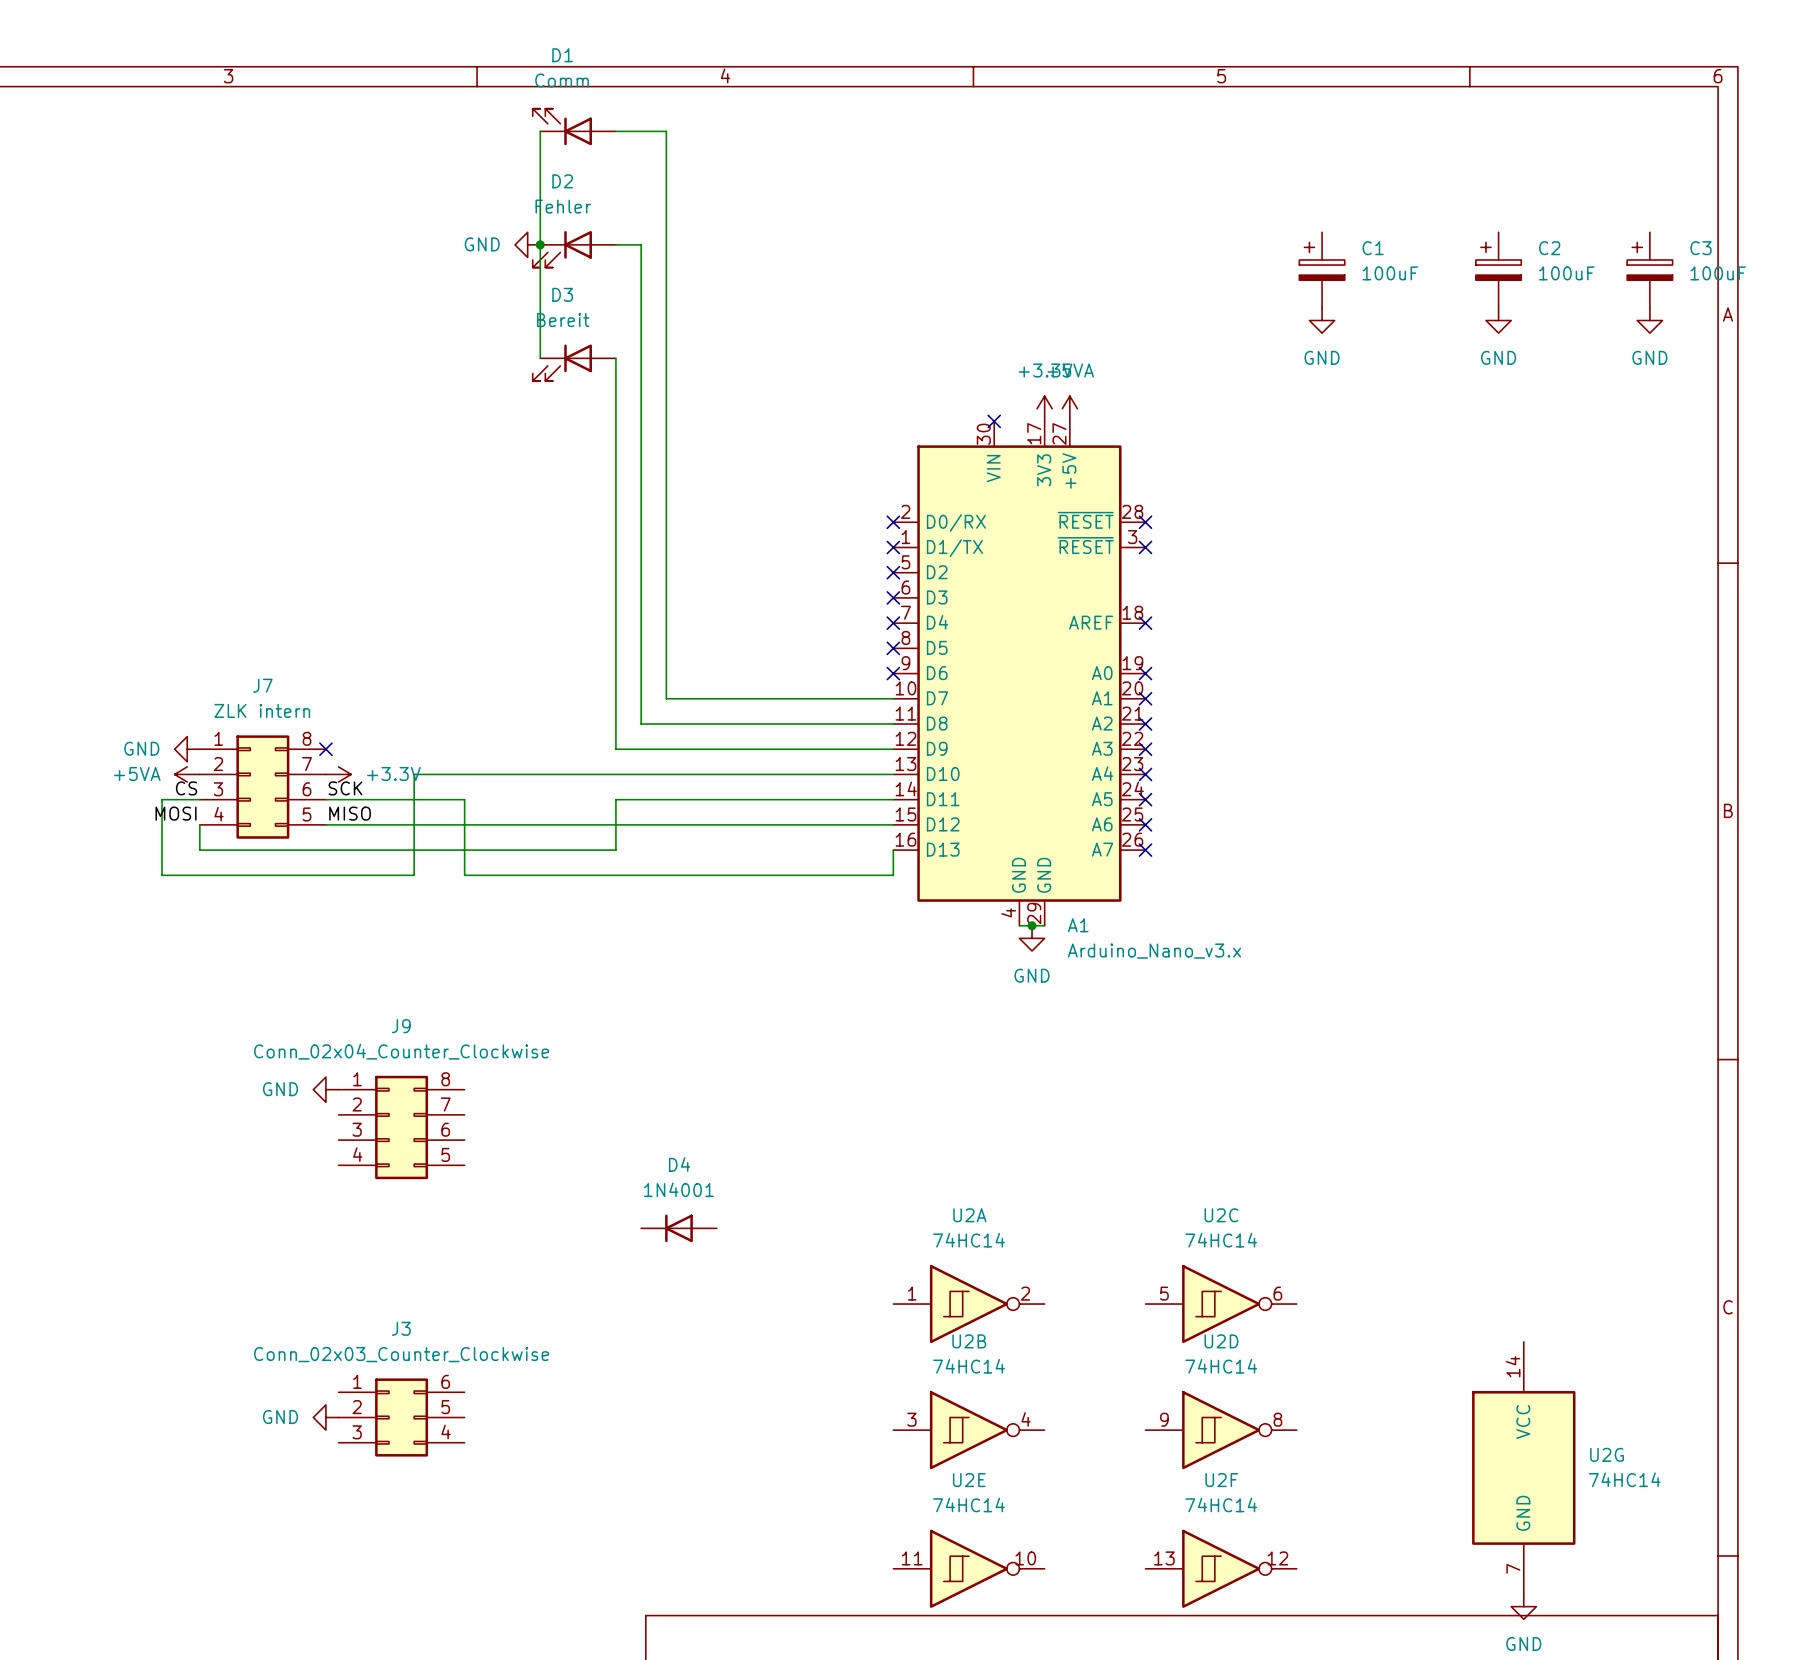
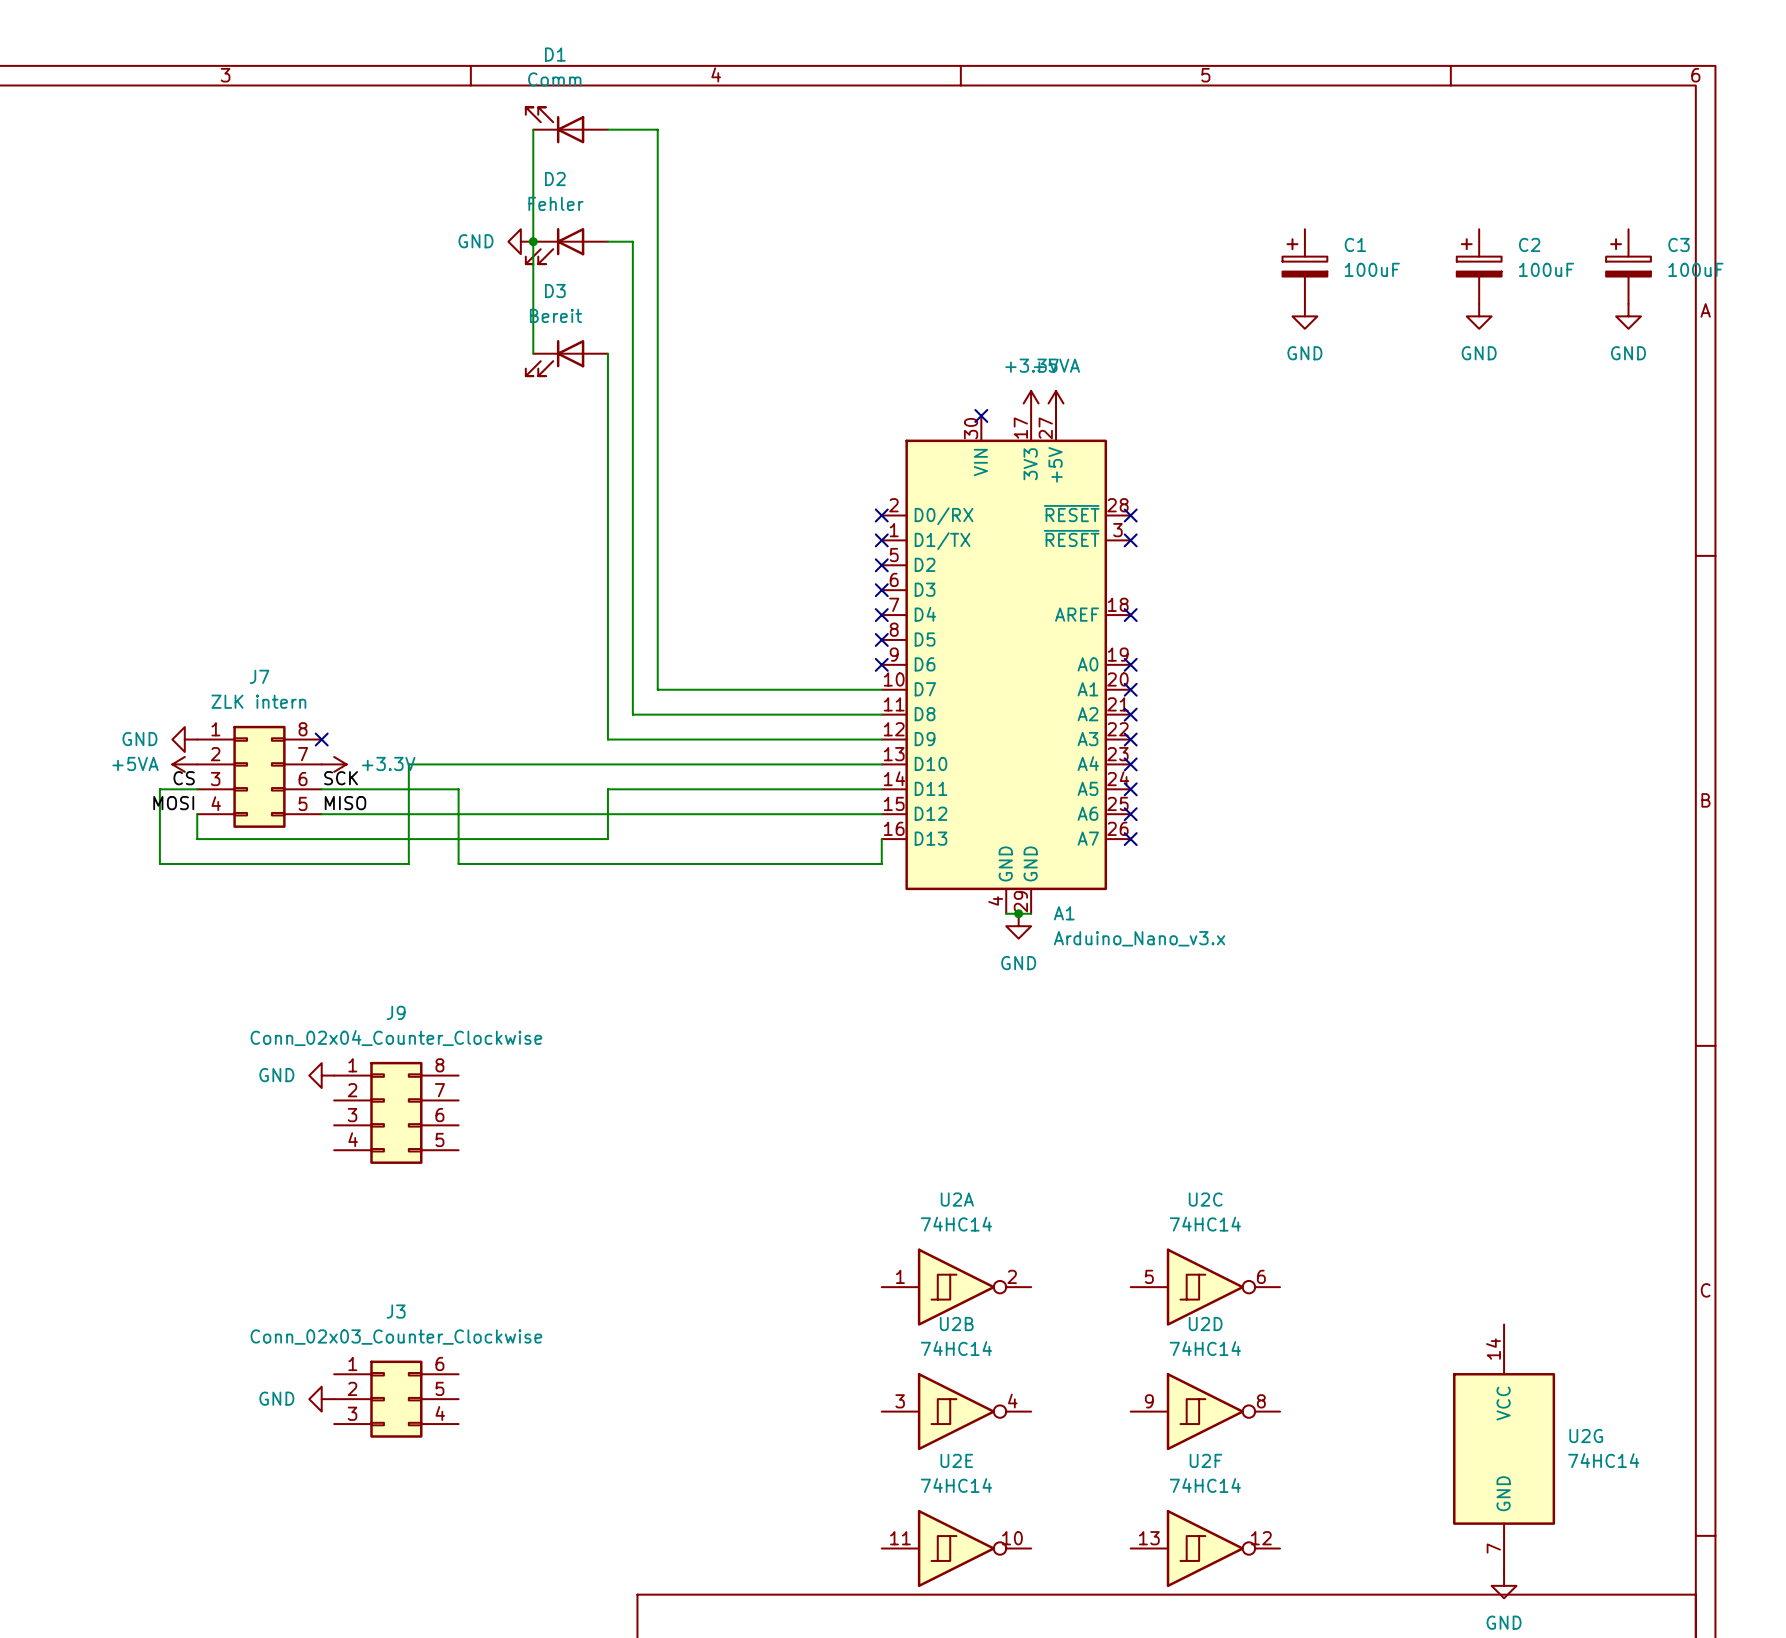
D4: 1N4001 (678, 1228) -> none

